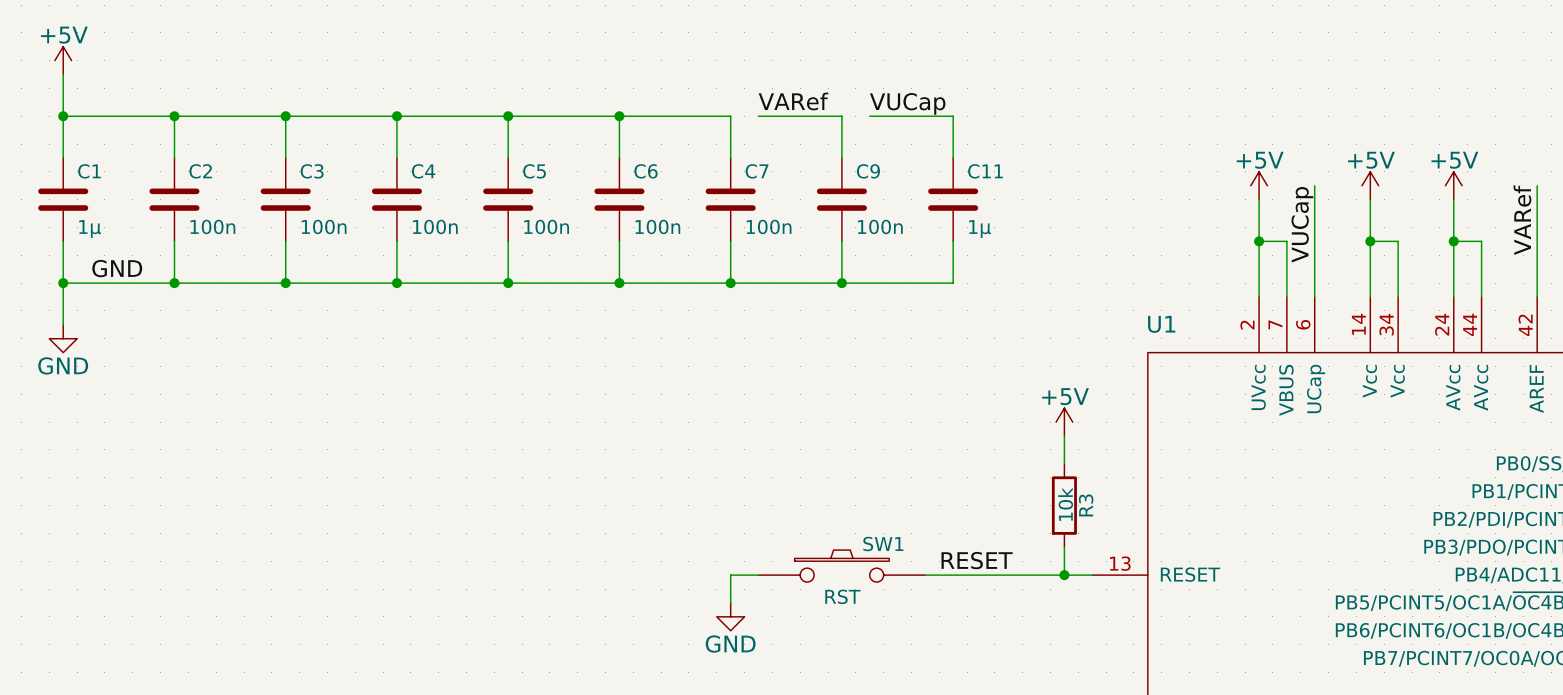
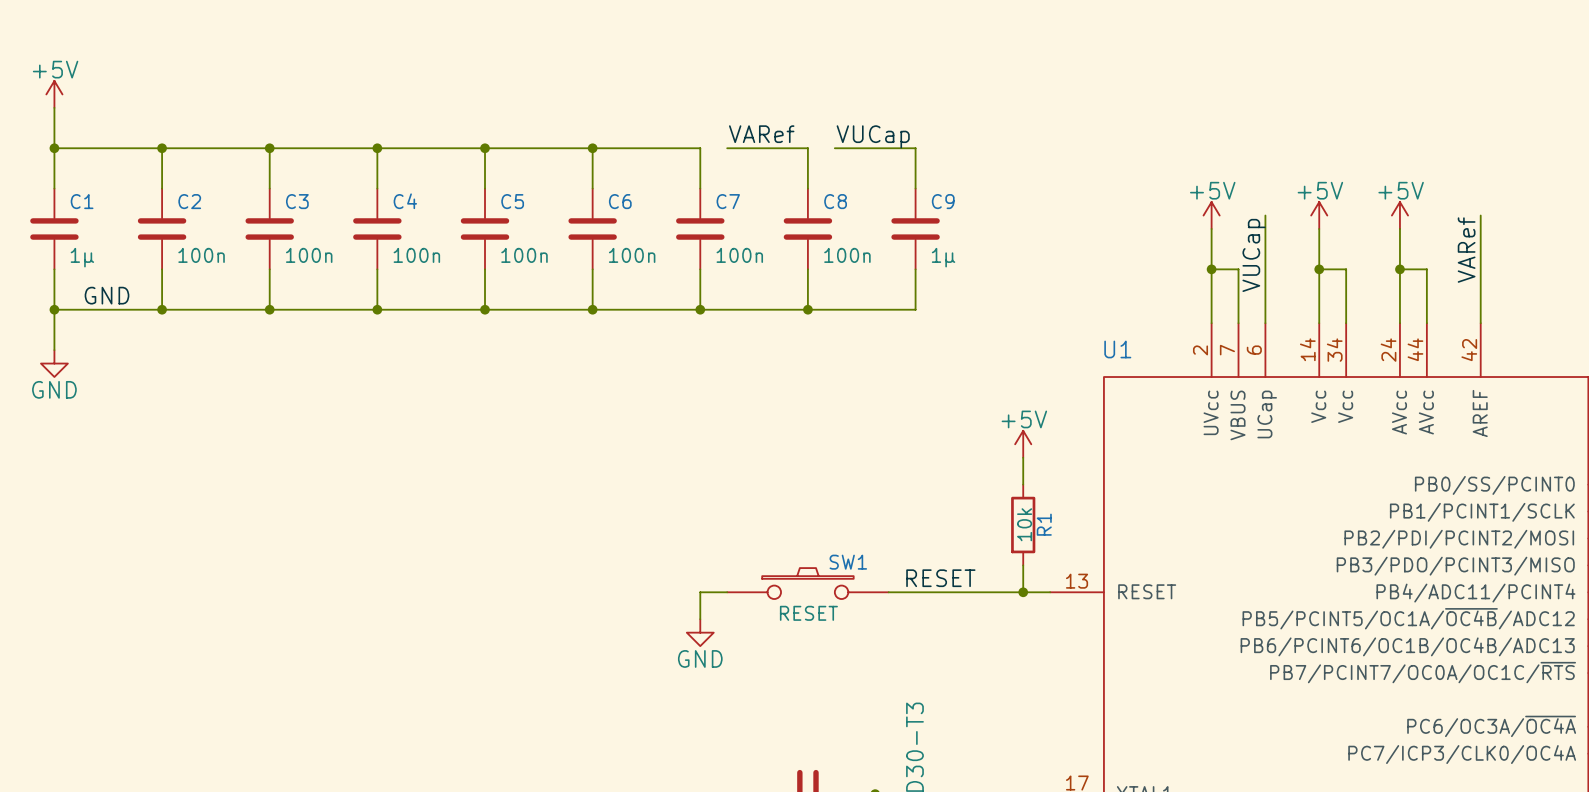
C9 name: C9 (868, 171) -> C8 (835, 201)
C11 name: C11 (985, 171) -> C9 (943, 201)
R3 name: R3 (1086, 505) -> R1 (1044, 524)
SW1 value: RST (842, 596) -> RESET (808, 613)

